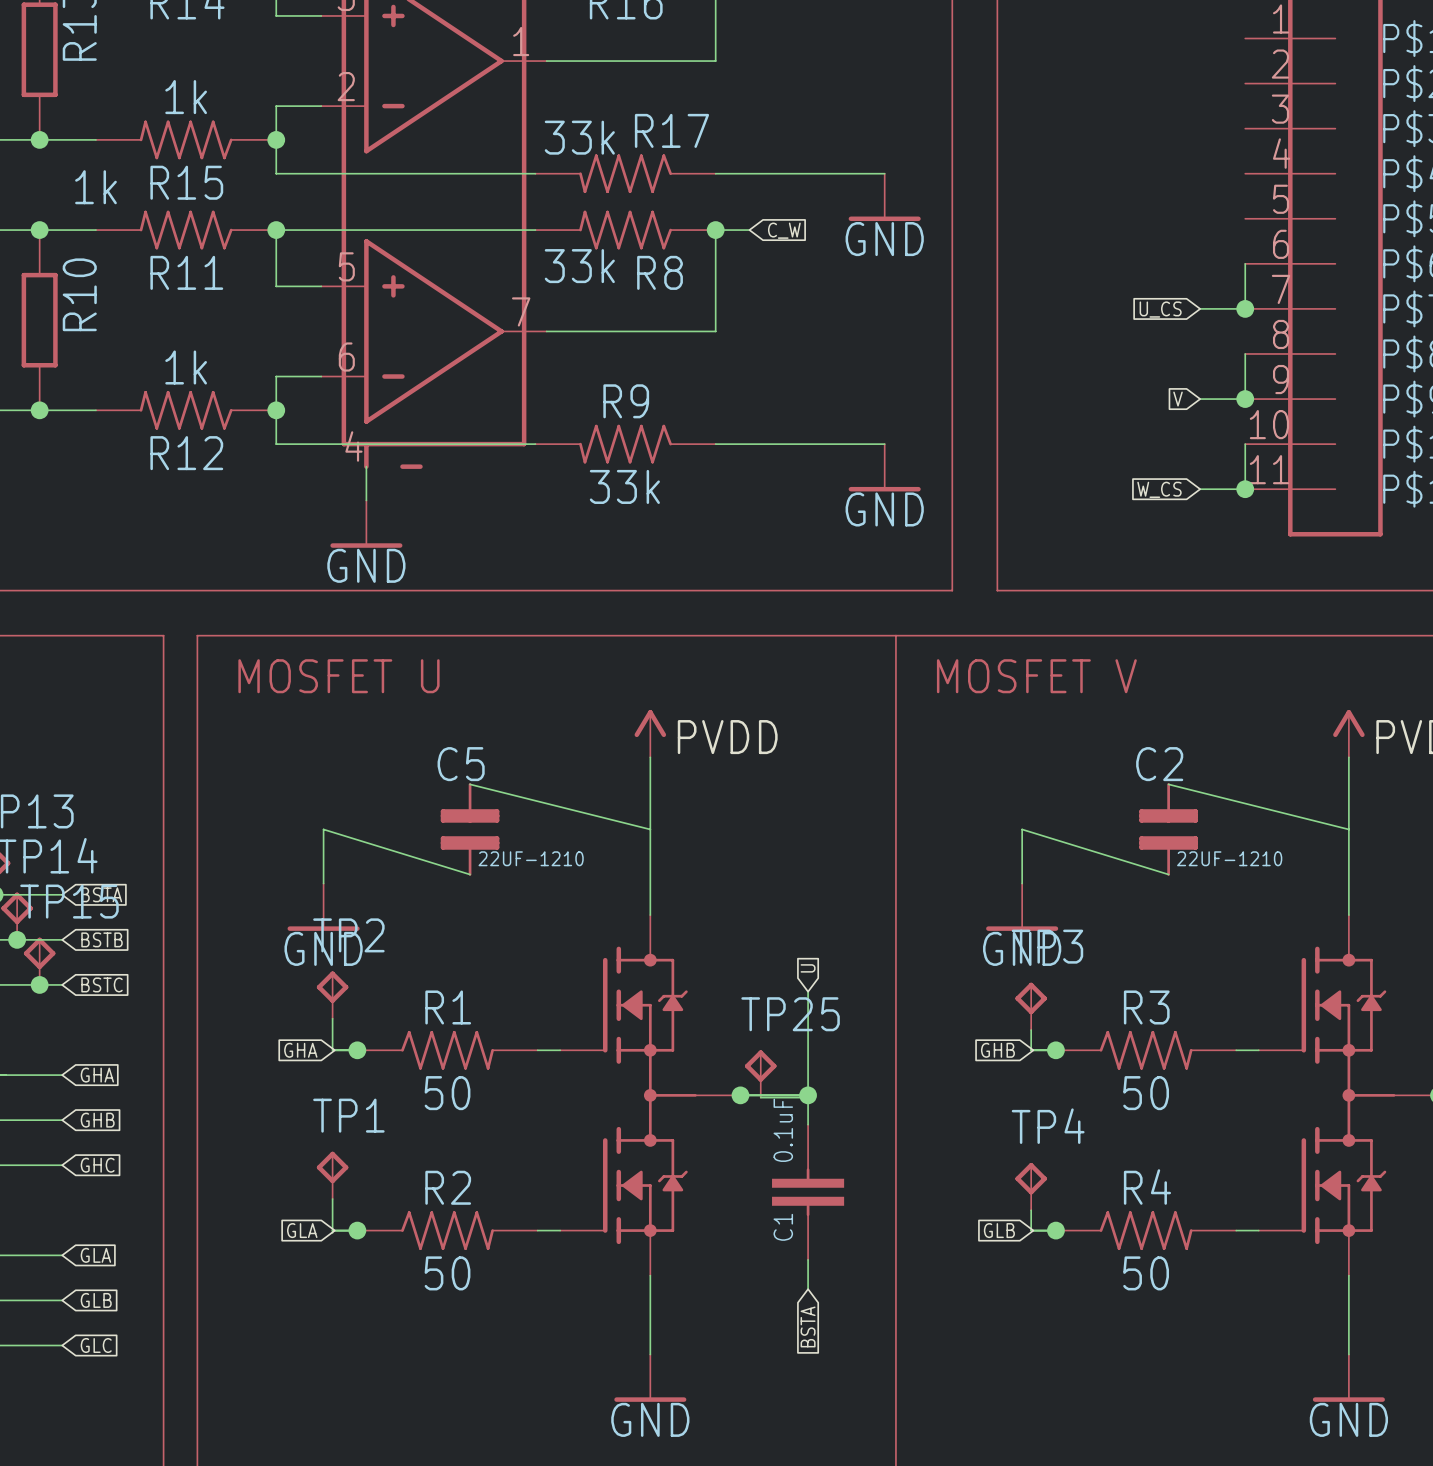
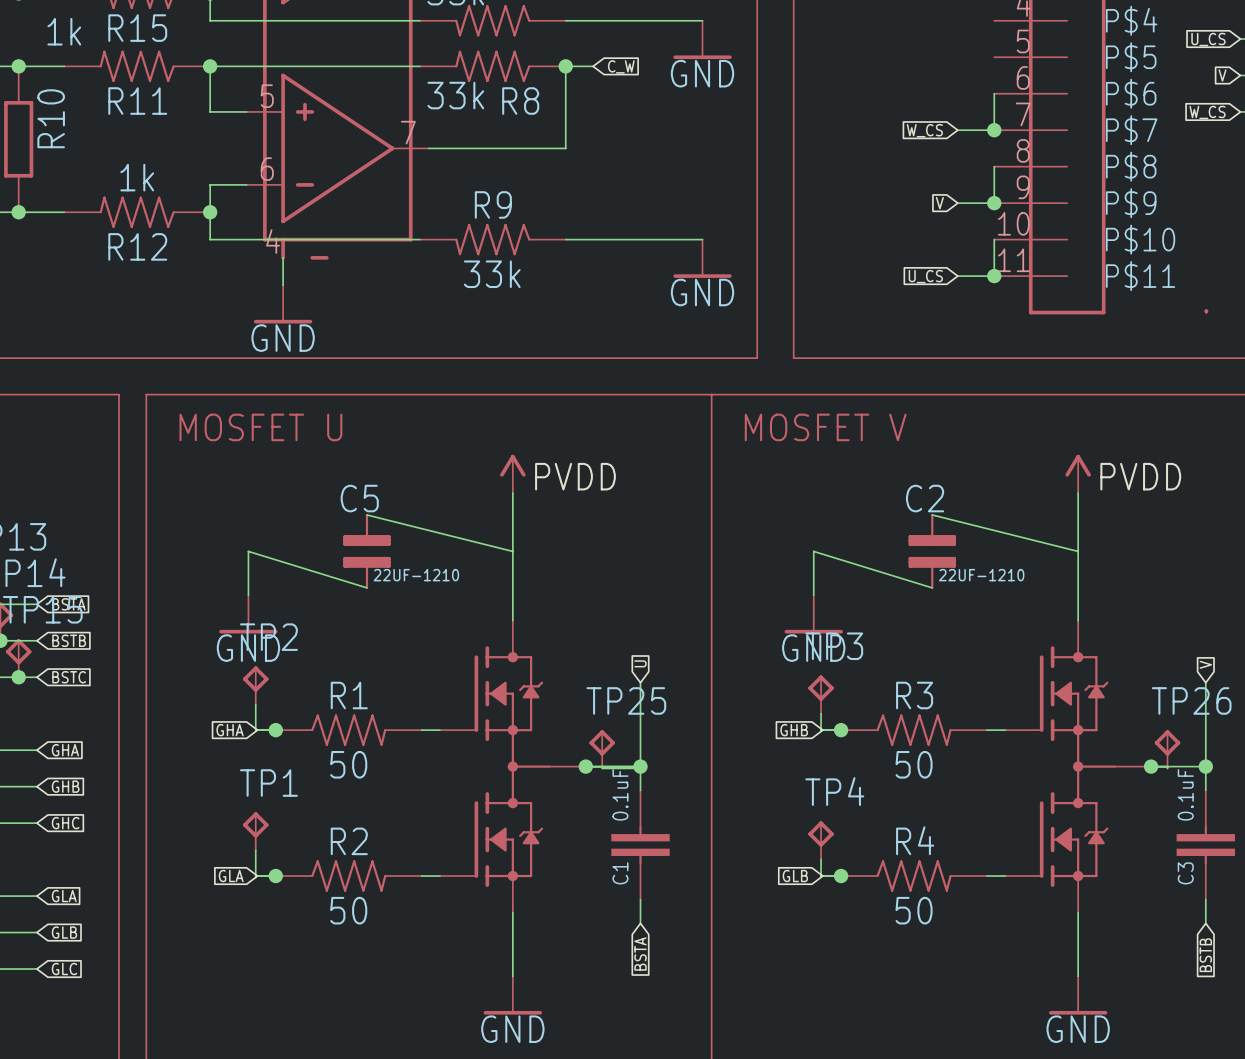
global label: U_CS (1160, 309) -> W_CS (924, 130)
global label: W_CS (1159, 489) -> U_CS (925, 276)

